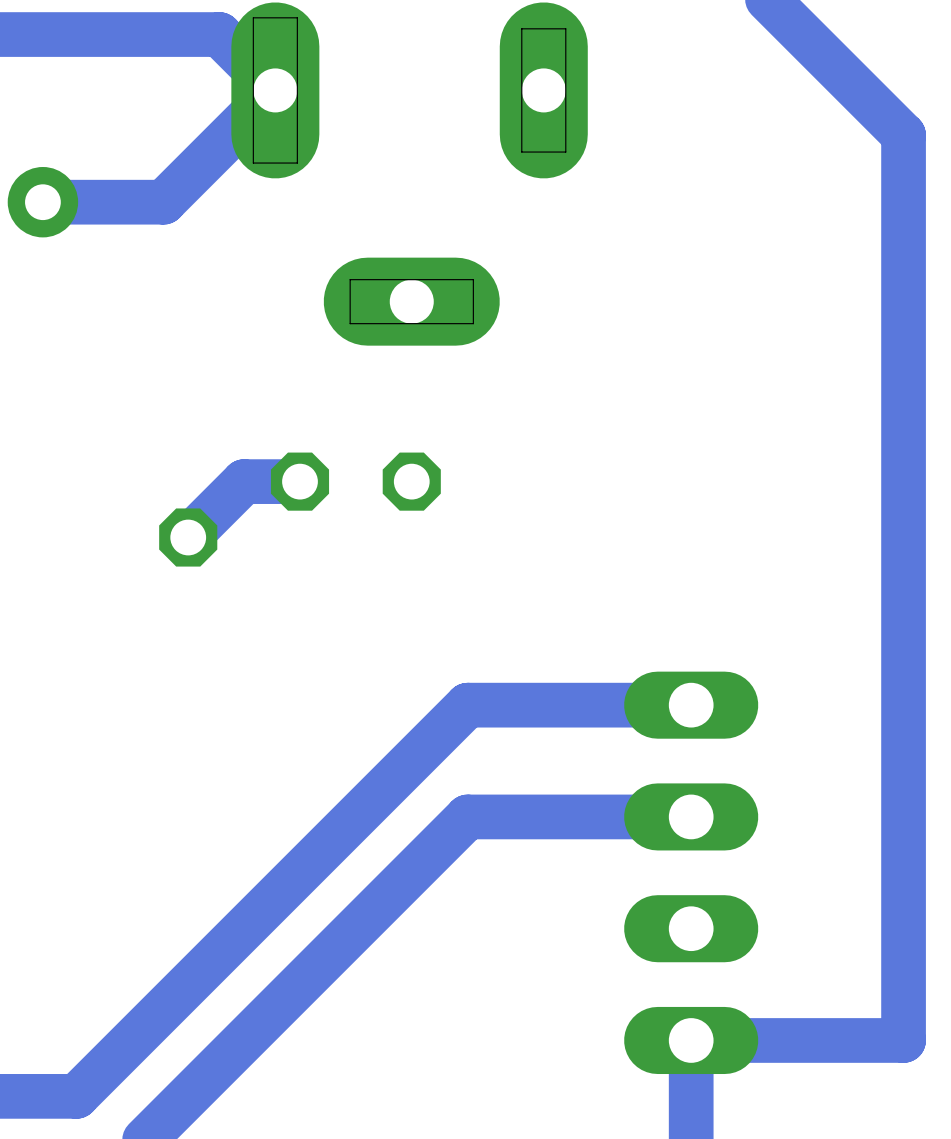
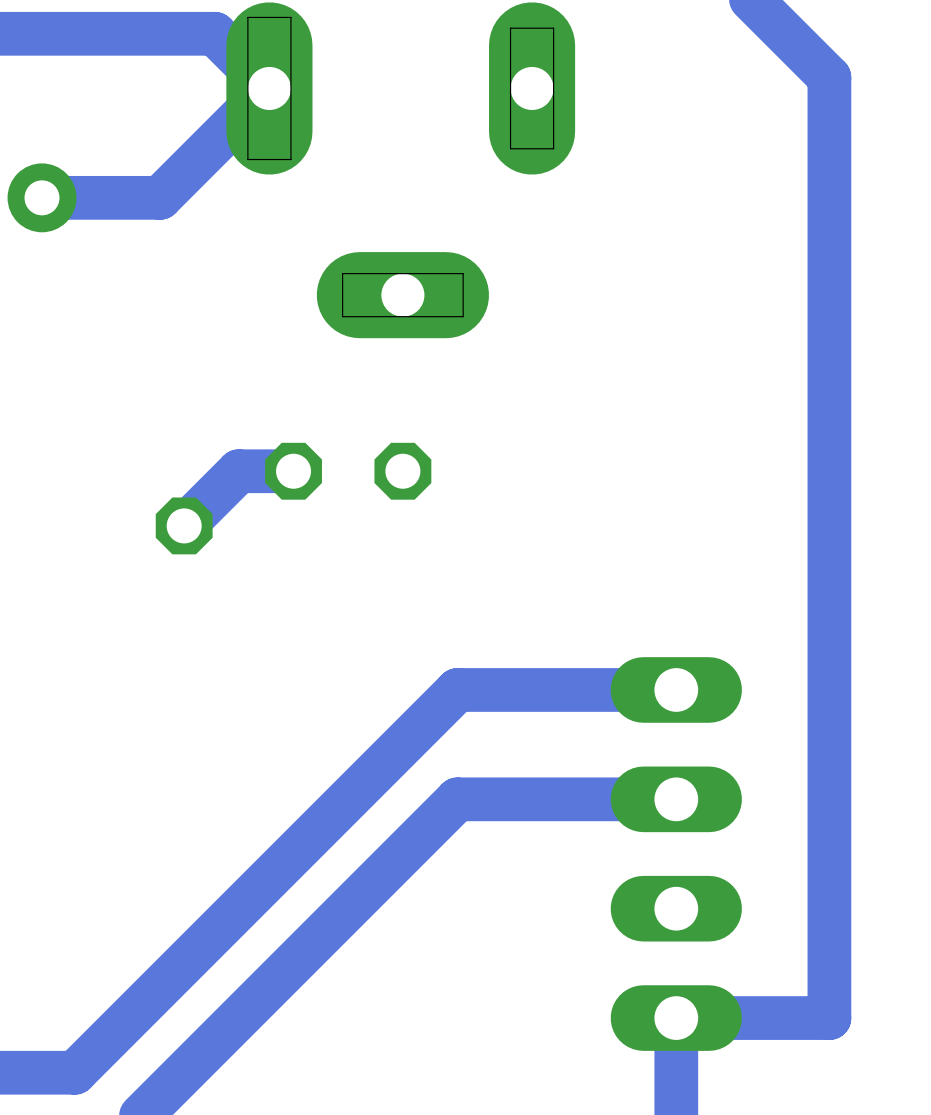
bottom track: (847, 79) (903, 135) (903, 1040) (847, 1040) -> (829, 77) (829, 1018)

